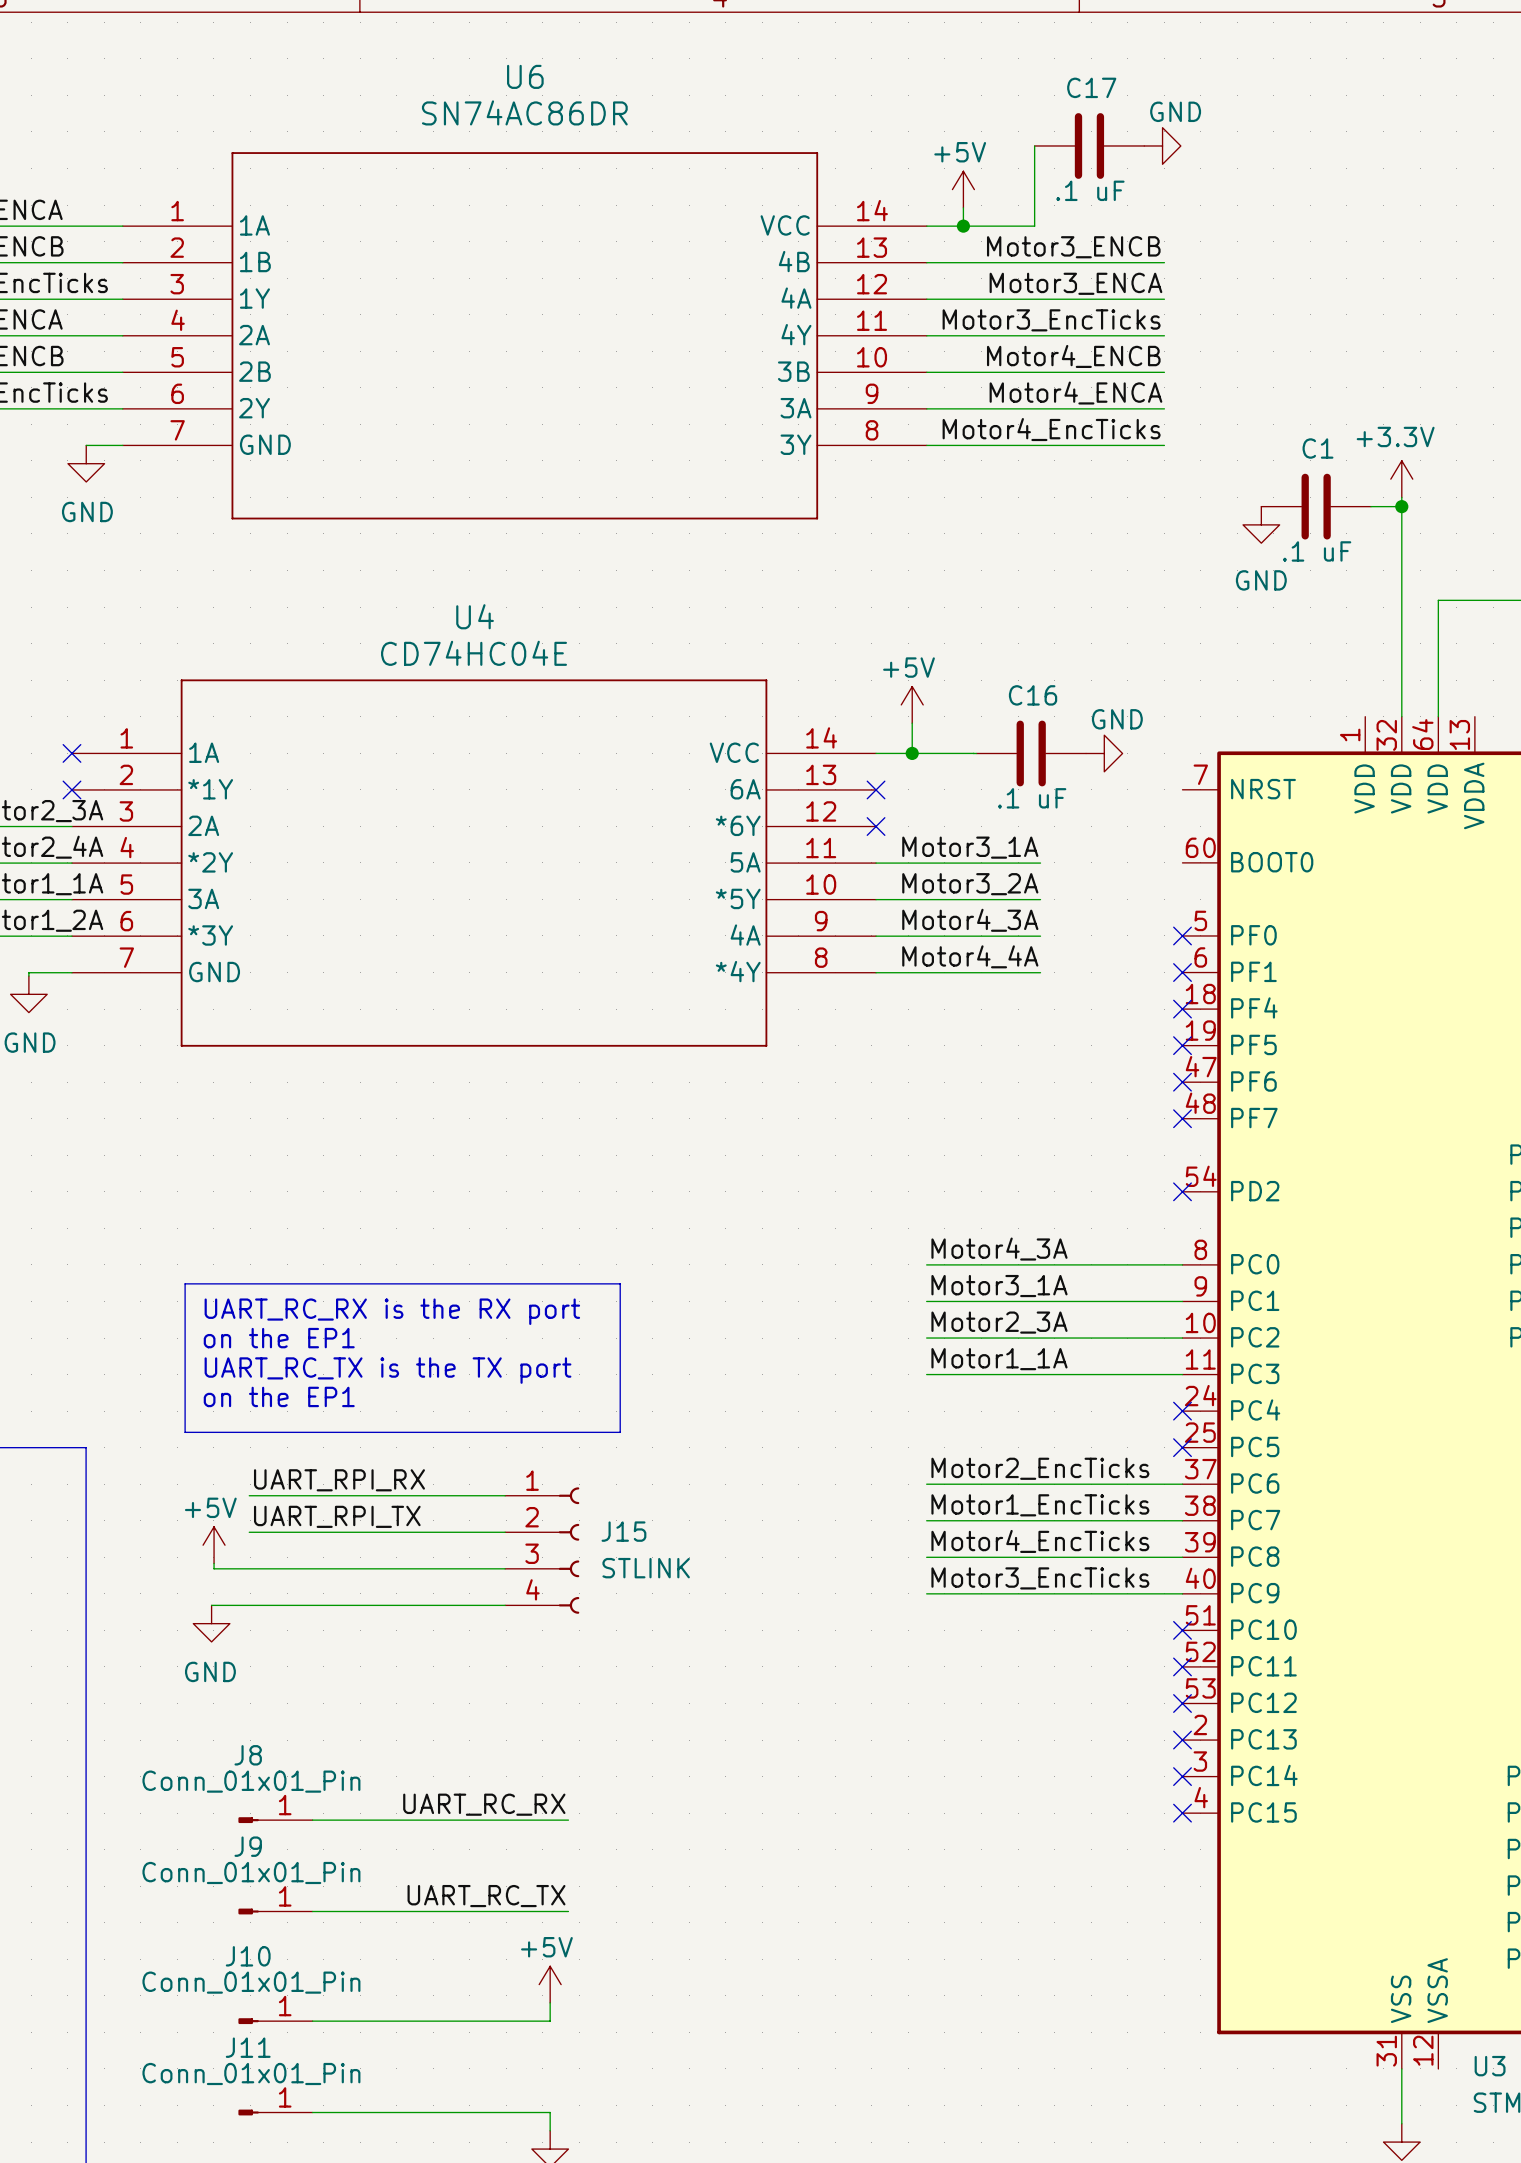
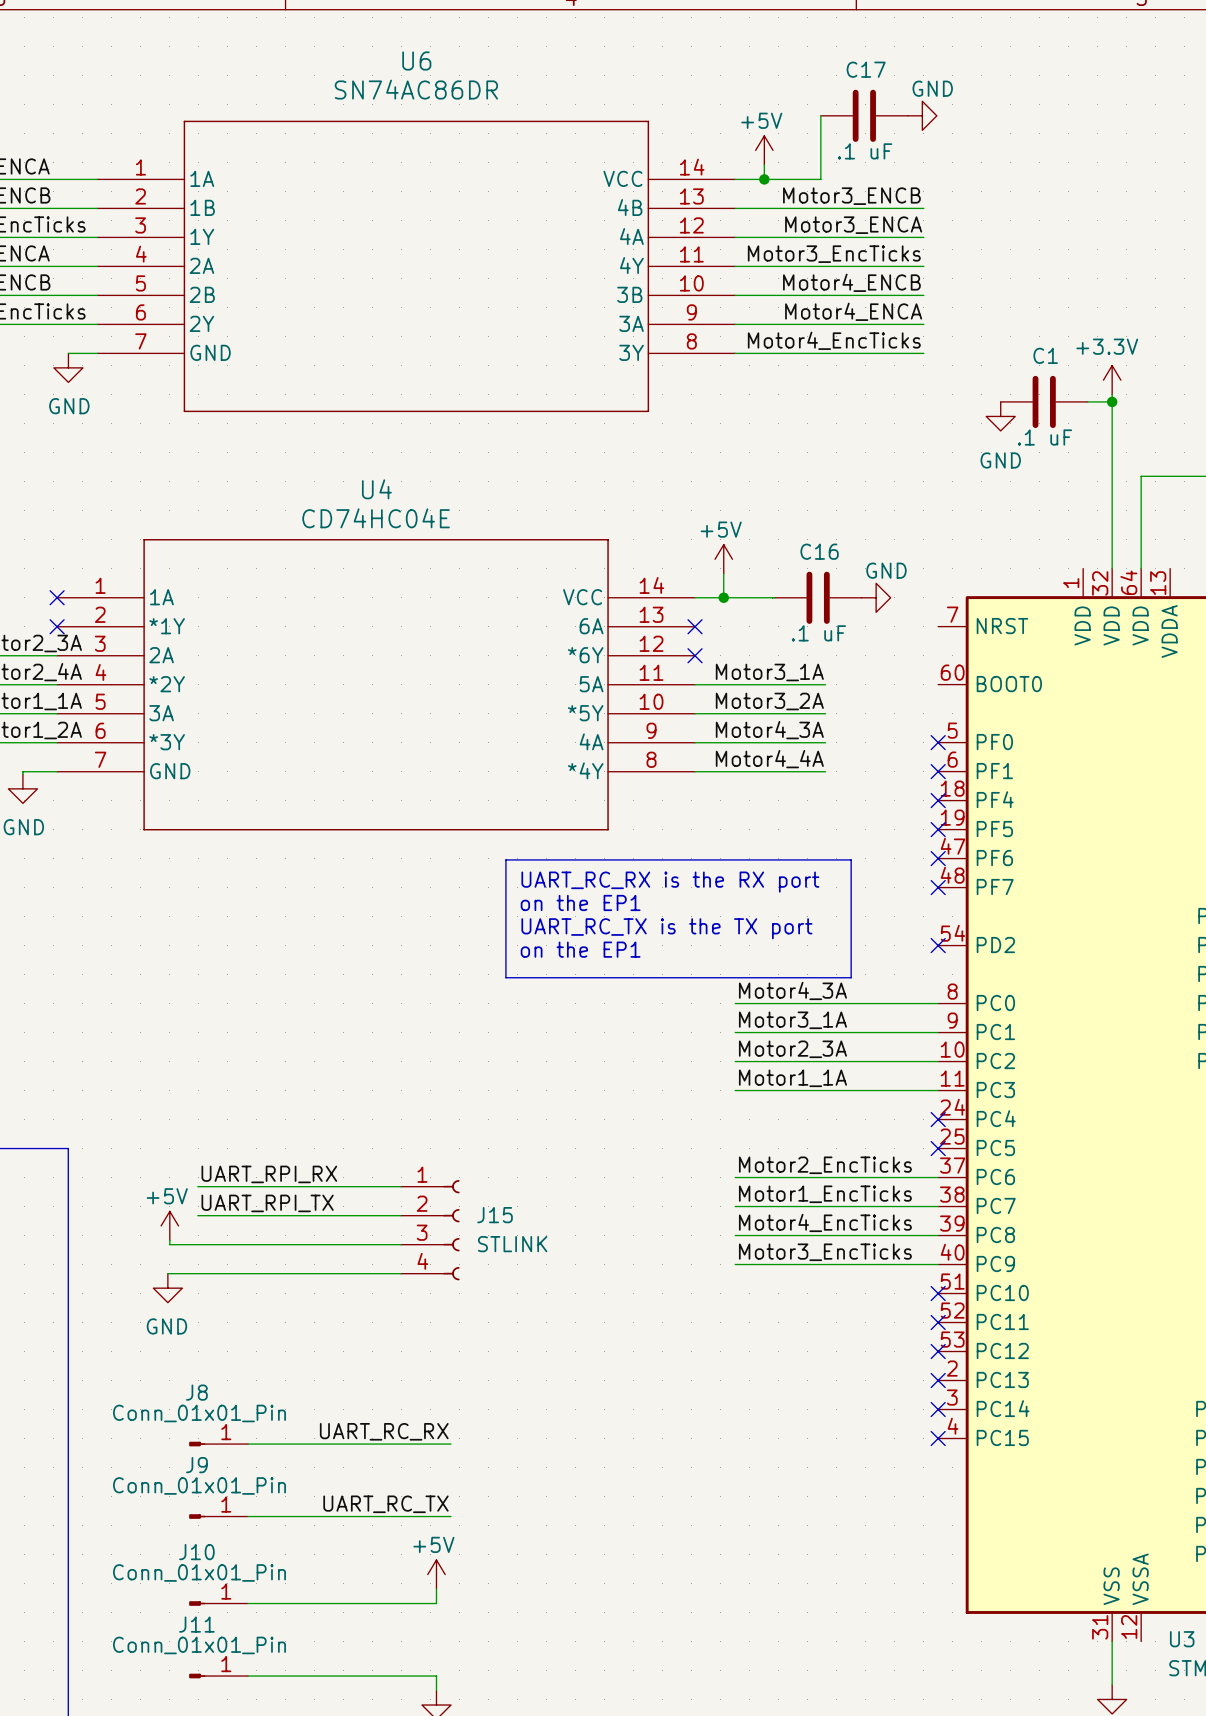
line: none -> (505, 859) (851, 859) (851, 977) (505, 977) (505, 859)
text: none -> UART_RC_RX is the RX port (670, 882)
text: none -> on the EP1 (580, 902)
text: none -> UART_RC_TX is the TX port (666, 928)
text: none -> on the EP1 (580, 949)
line: (185, 1283) (620, 1283) (620, 1432) (185, 1432) (185, 1283) -> none
text: UART_RC_RX is the RX port (392, 1311) -> none
text: on the EP1 (279, 1338) -> none
text: UART_RC_TX is the TX port (388, 1370) -> none
text: on the EP1 (279, 1396) -> none

